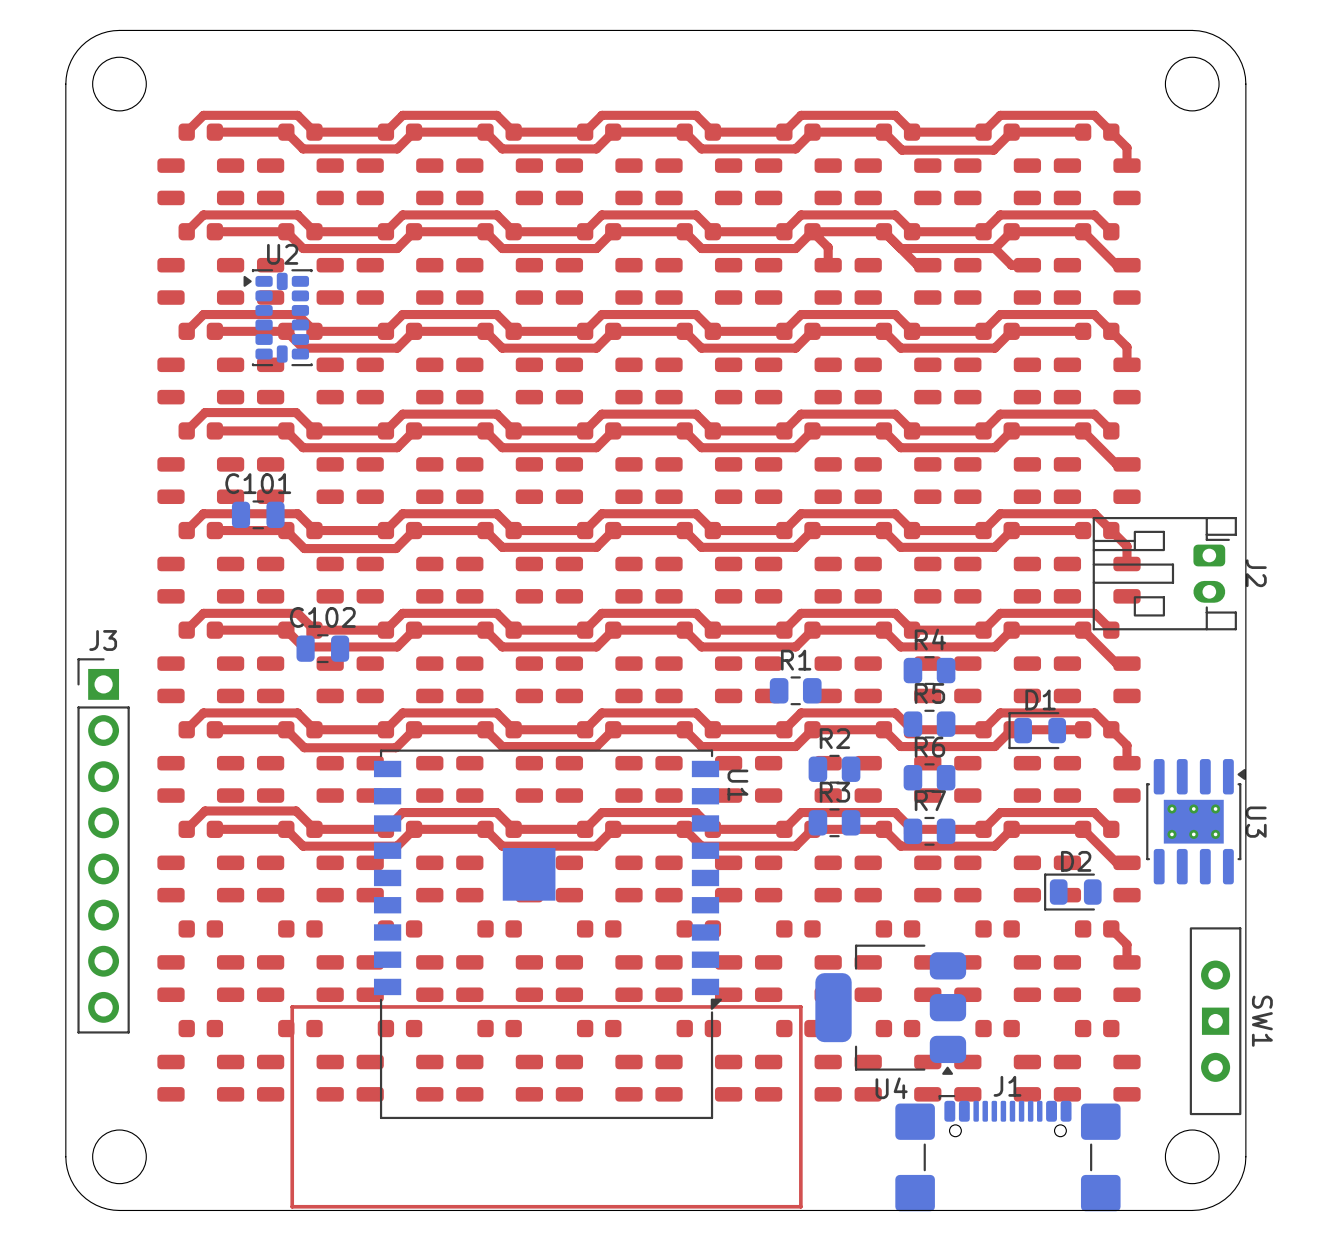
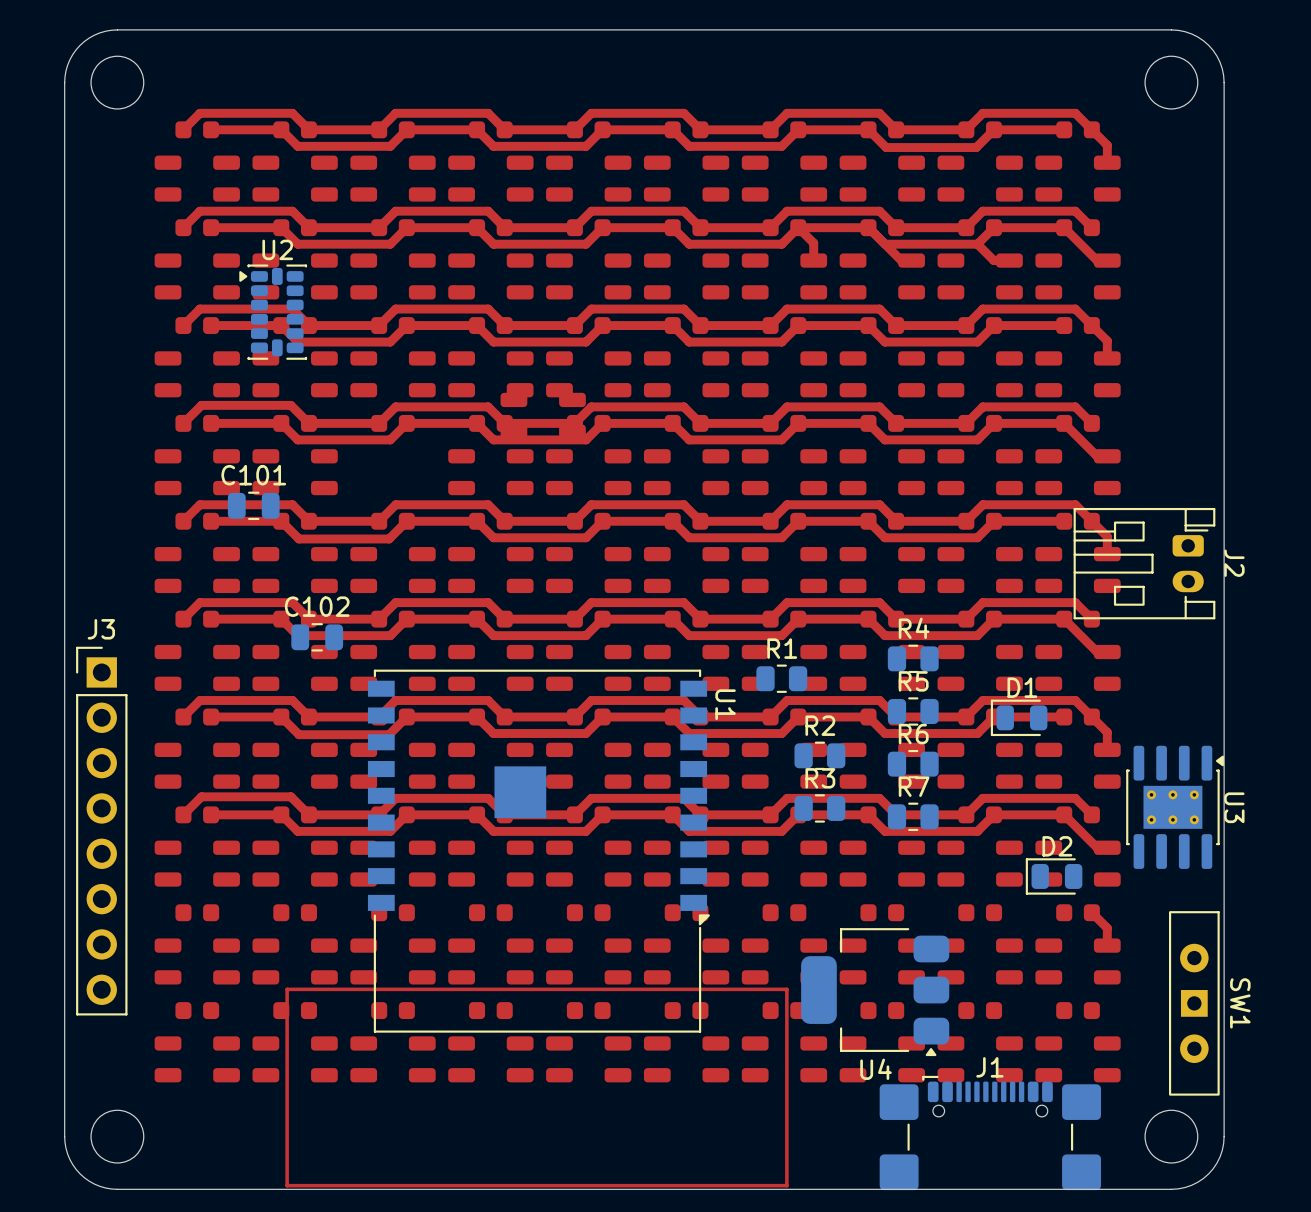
part position: (400, 480) -> (543, 415)
U1 position: (547, 934) -> (538, 851)

